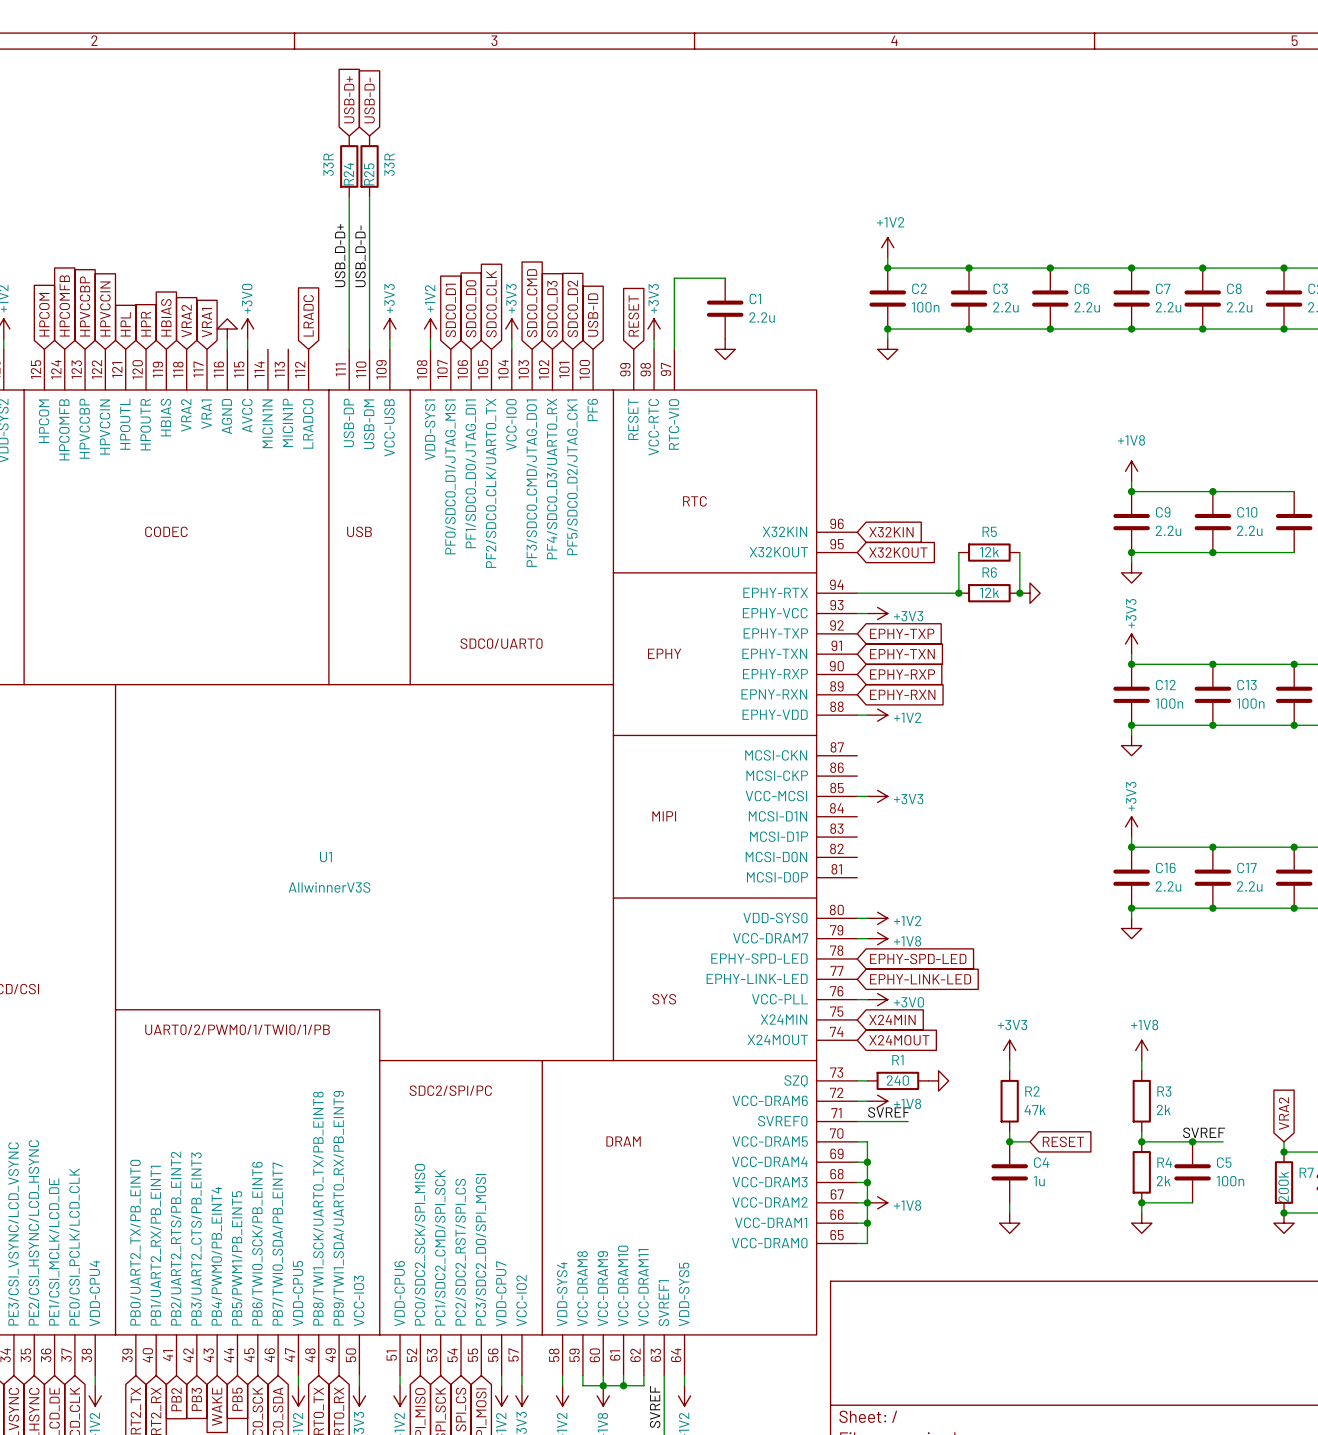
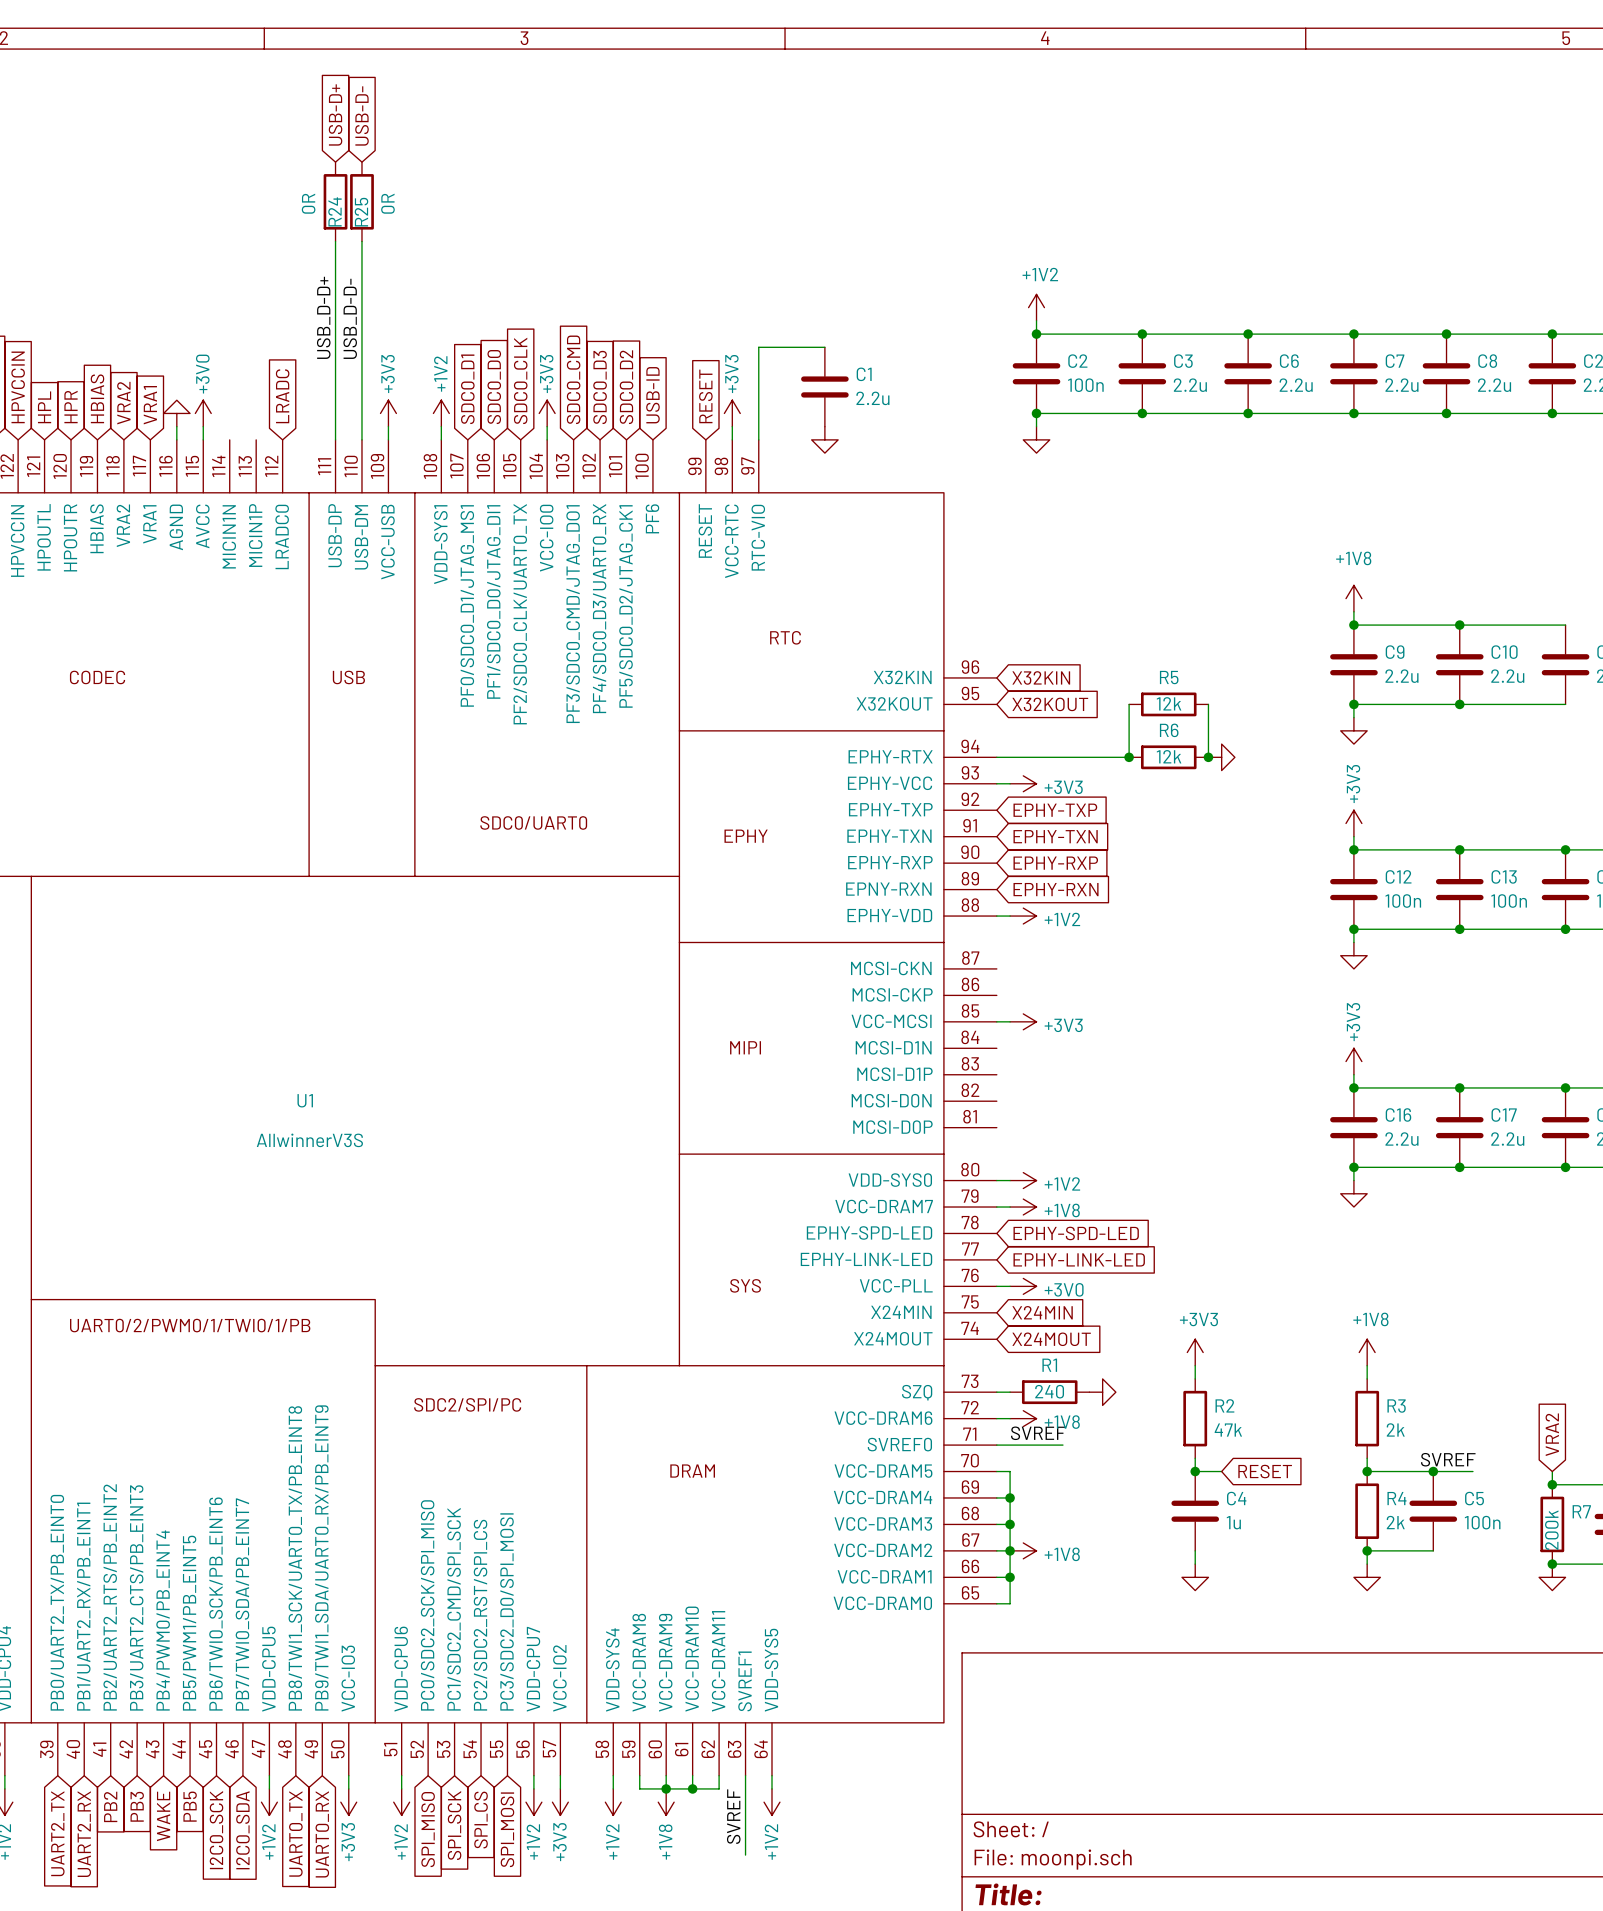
R24 value: 33R (328, 164) -> 0R (308, 203)
R25 value: 33R (389, 164) -> 0R (387, 203)

